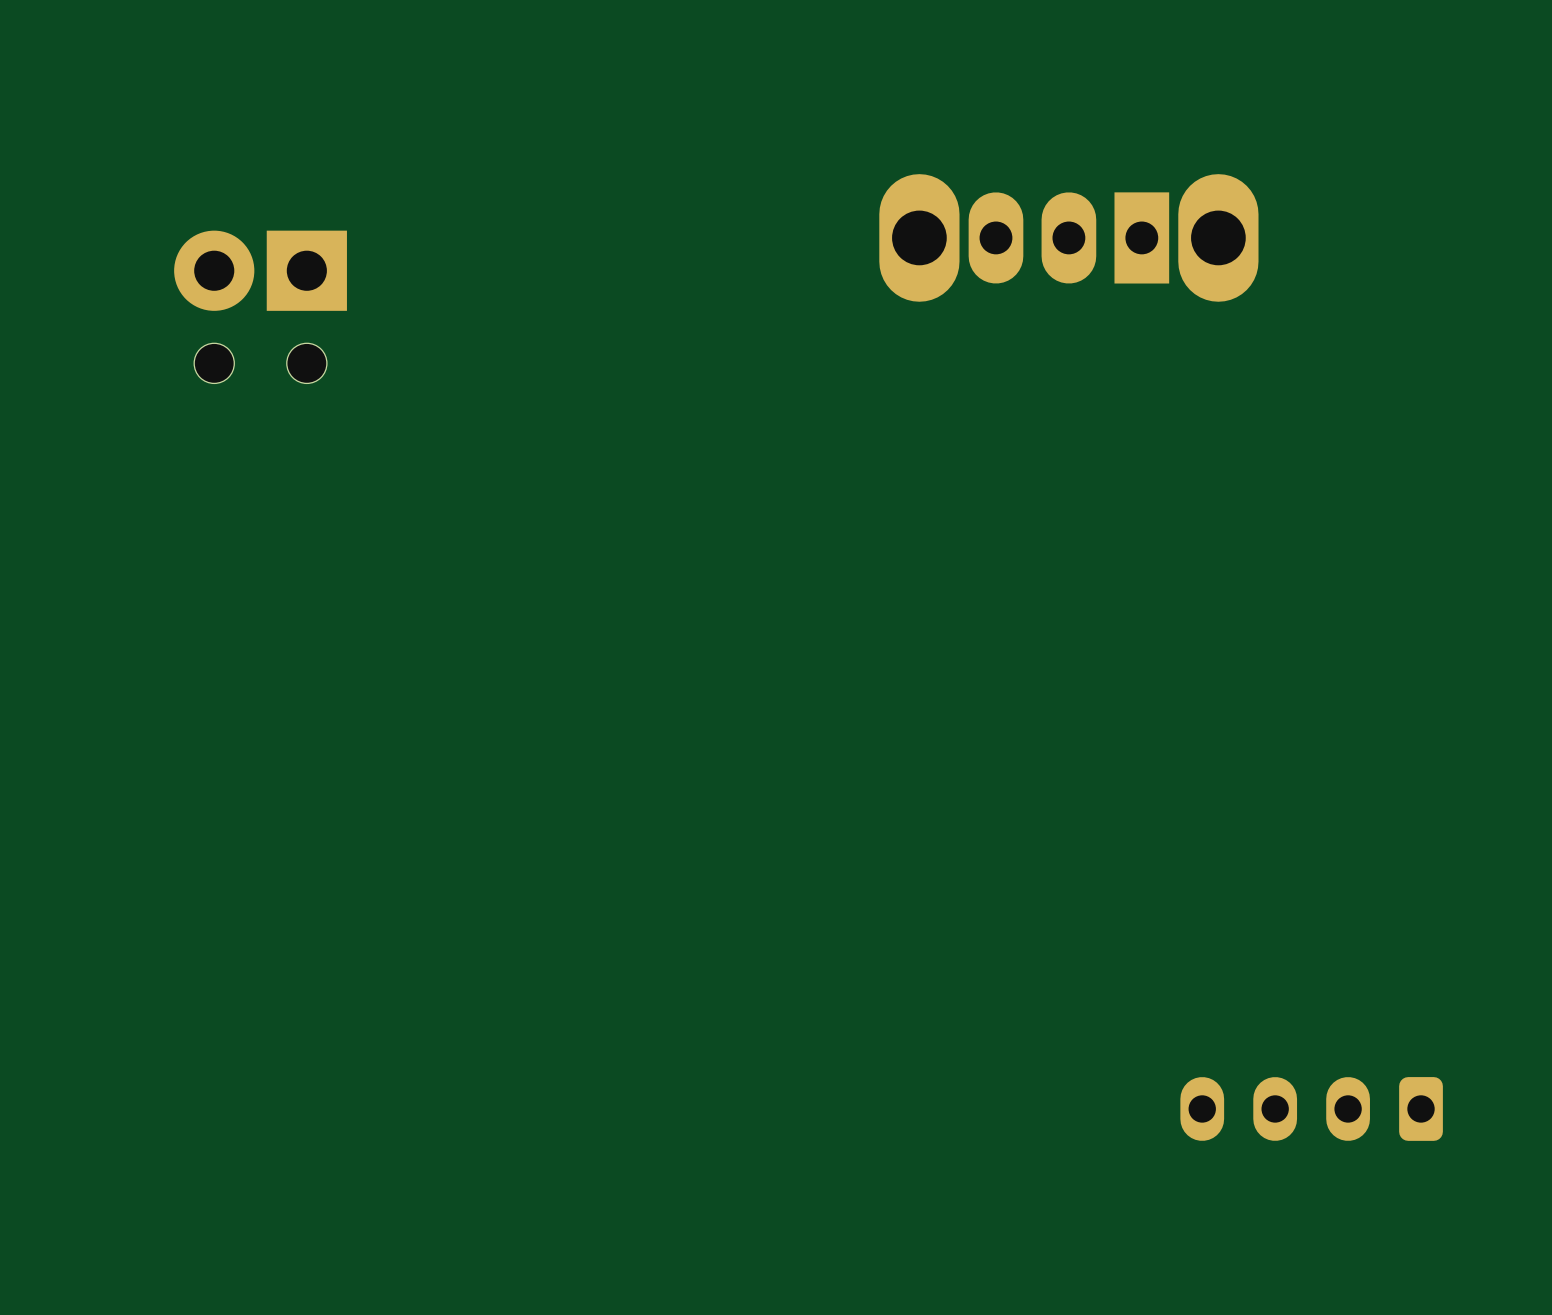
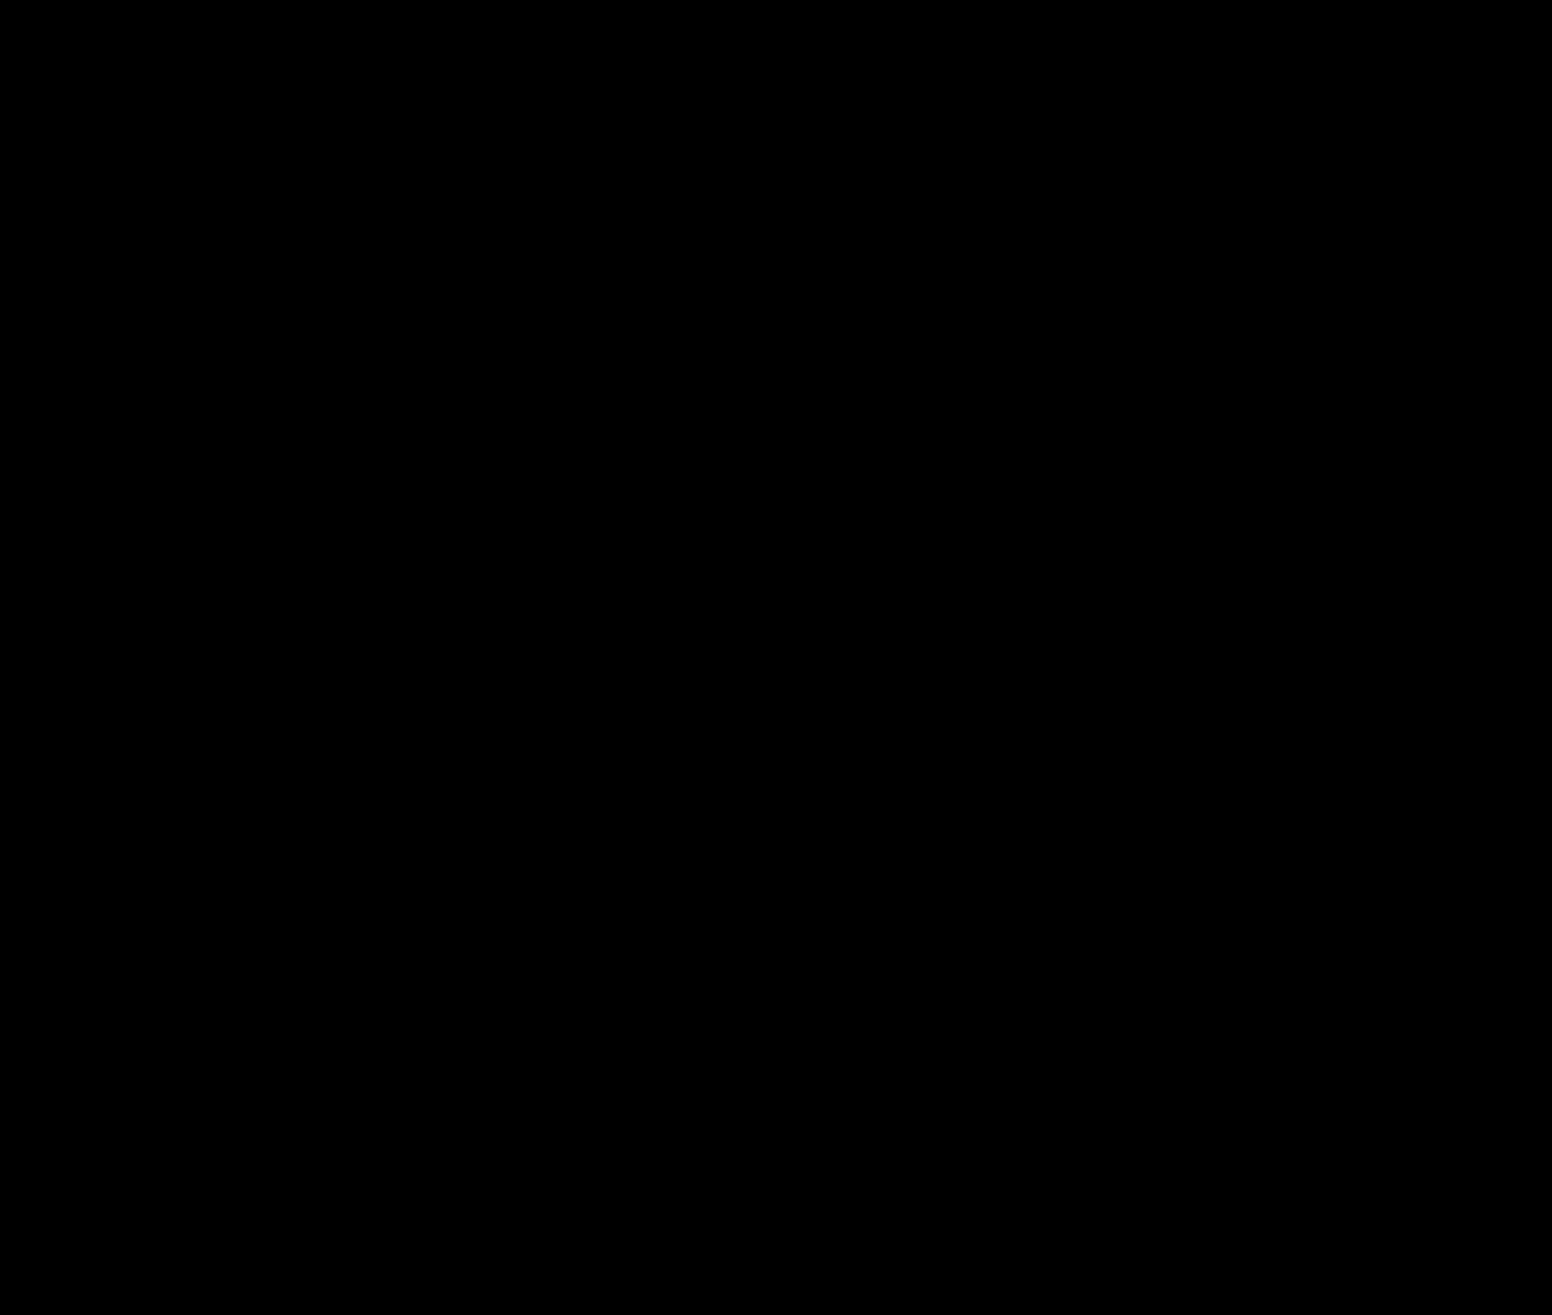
part: (1068, 237) -> none
part: (260, 307) -> none
part: (1311, 1108) -> none

